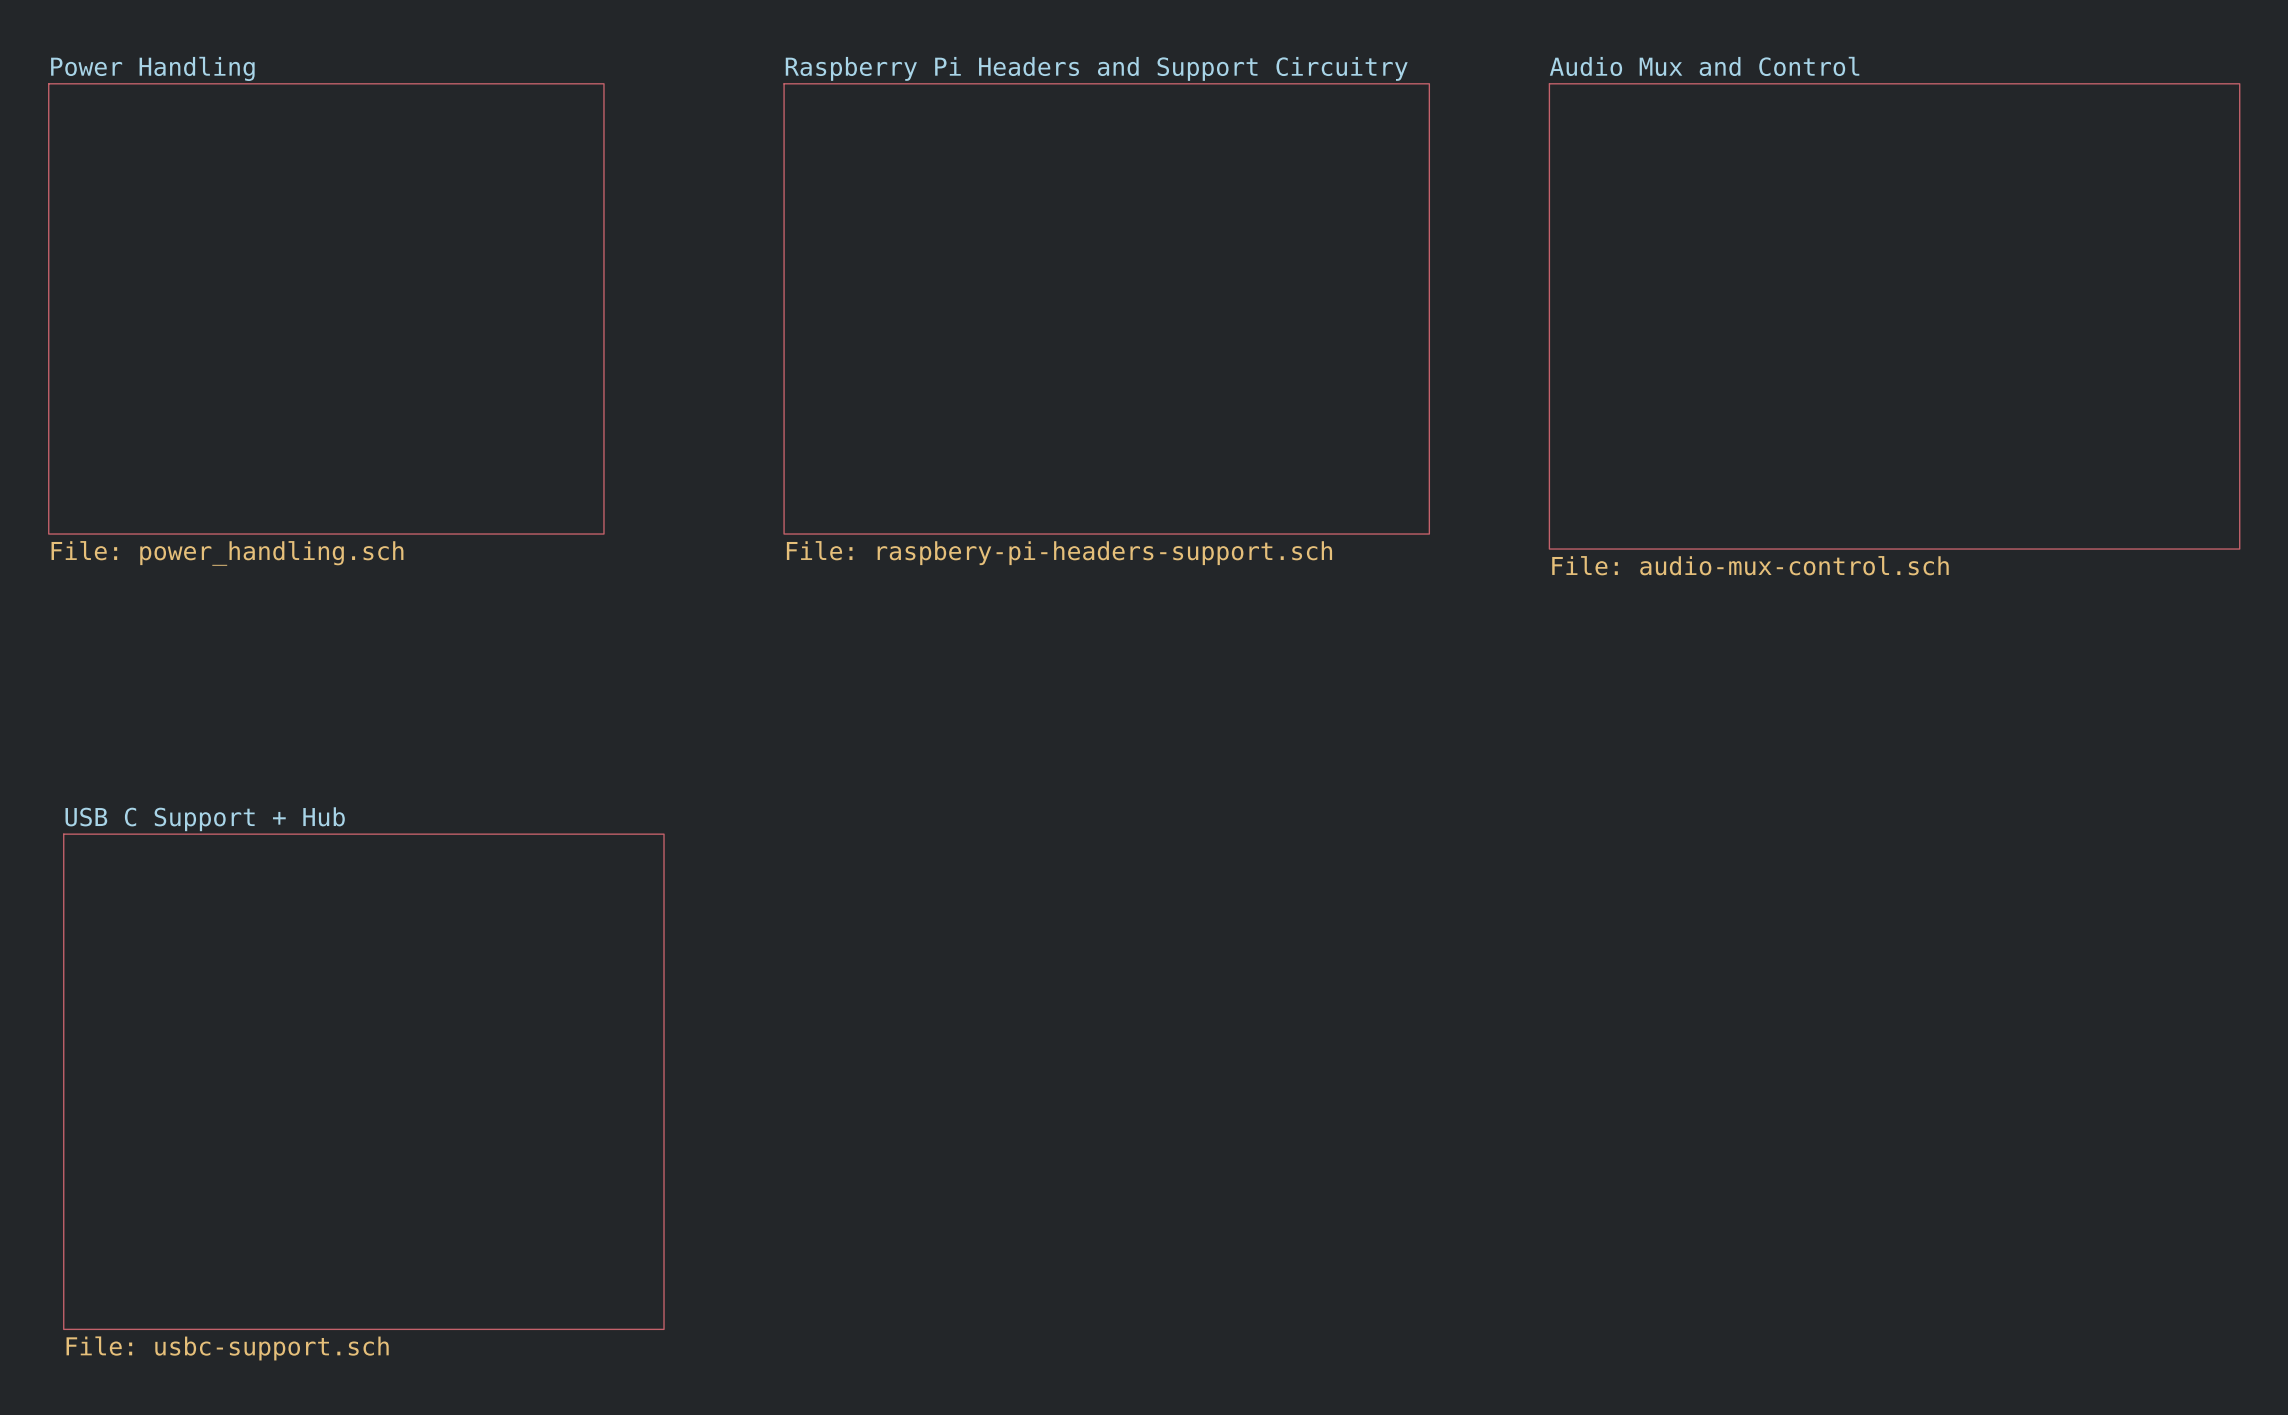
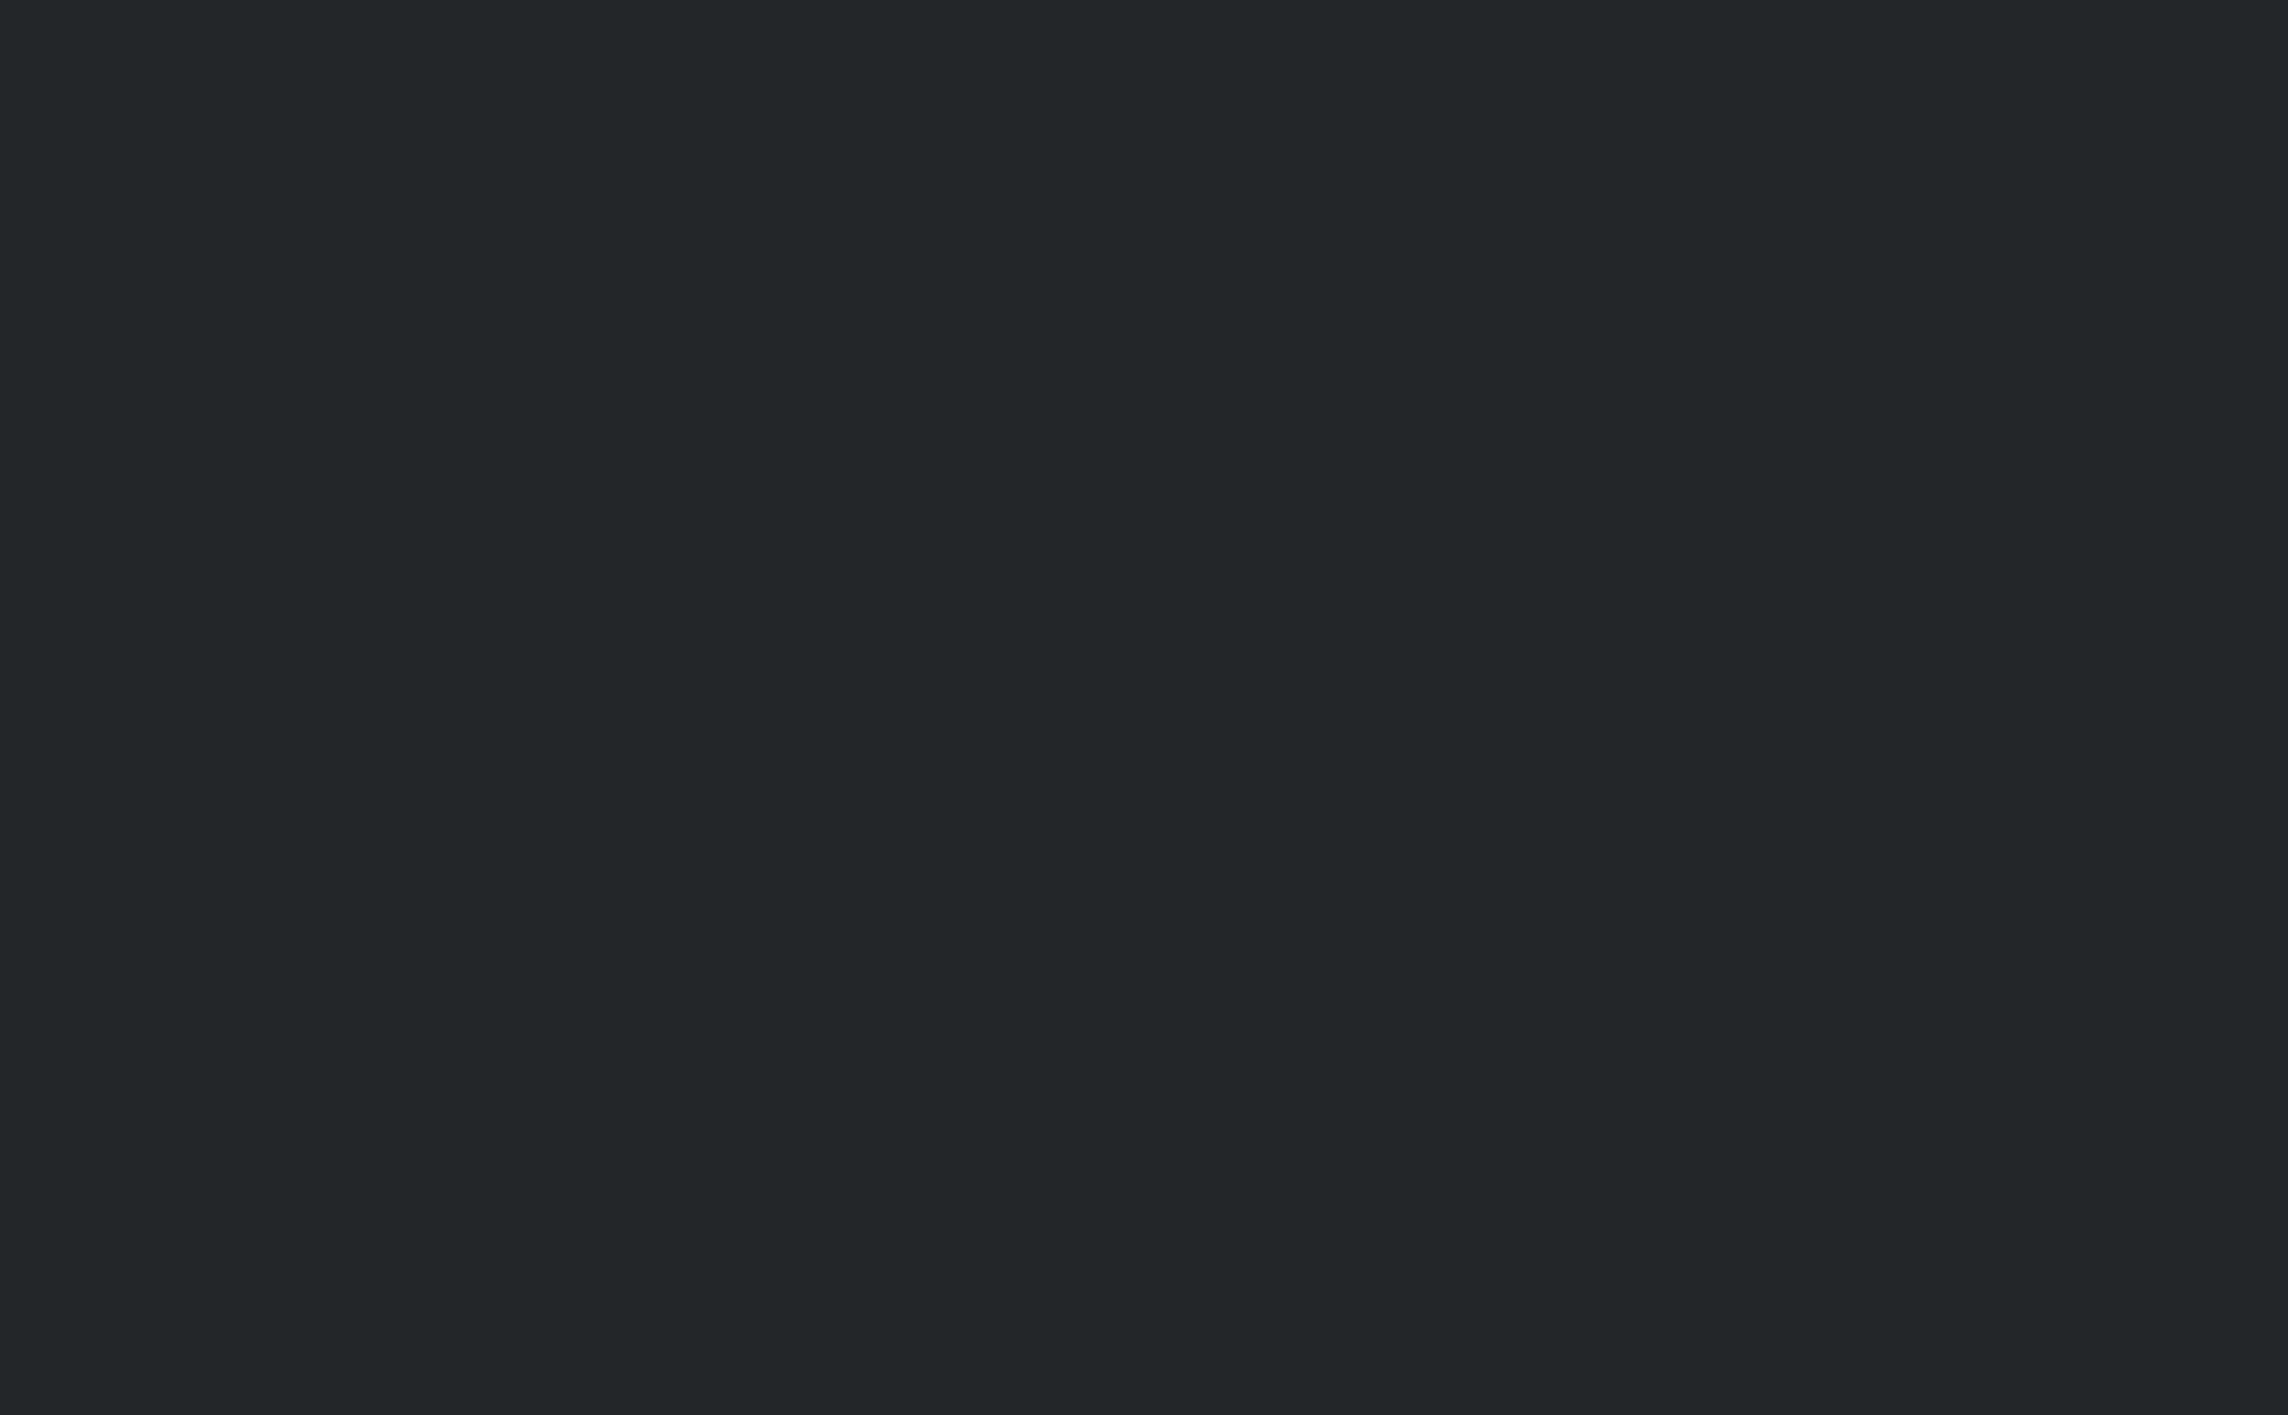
sheet Power Handling: File: power_handling.sch (326, 308) -> none
sheet Raspberry Pi Headers and Support Circuitry: File: raspbery-pi-headers-support.sch (1106, 308) -> none
sheet Audio Mux and Control: File: audio-mux-control.sch (1894, 316) -> none
sheet USB C Support + Hub: File: usbc-support.sch (363, 1081) -> none

